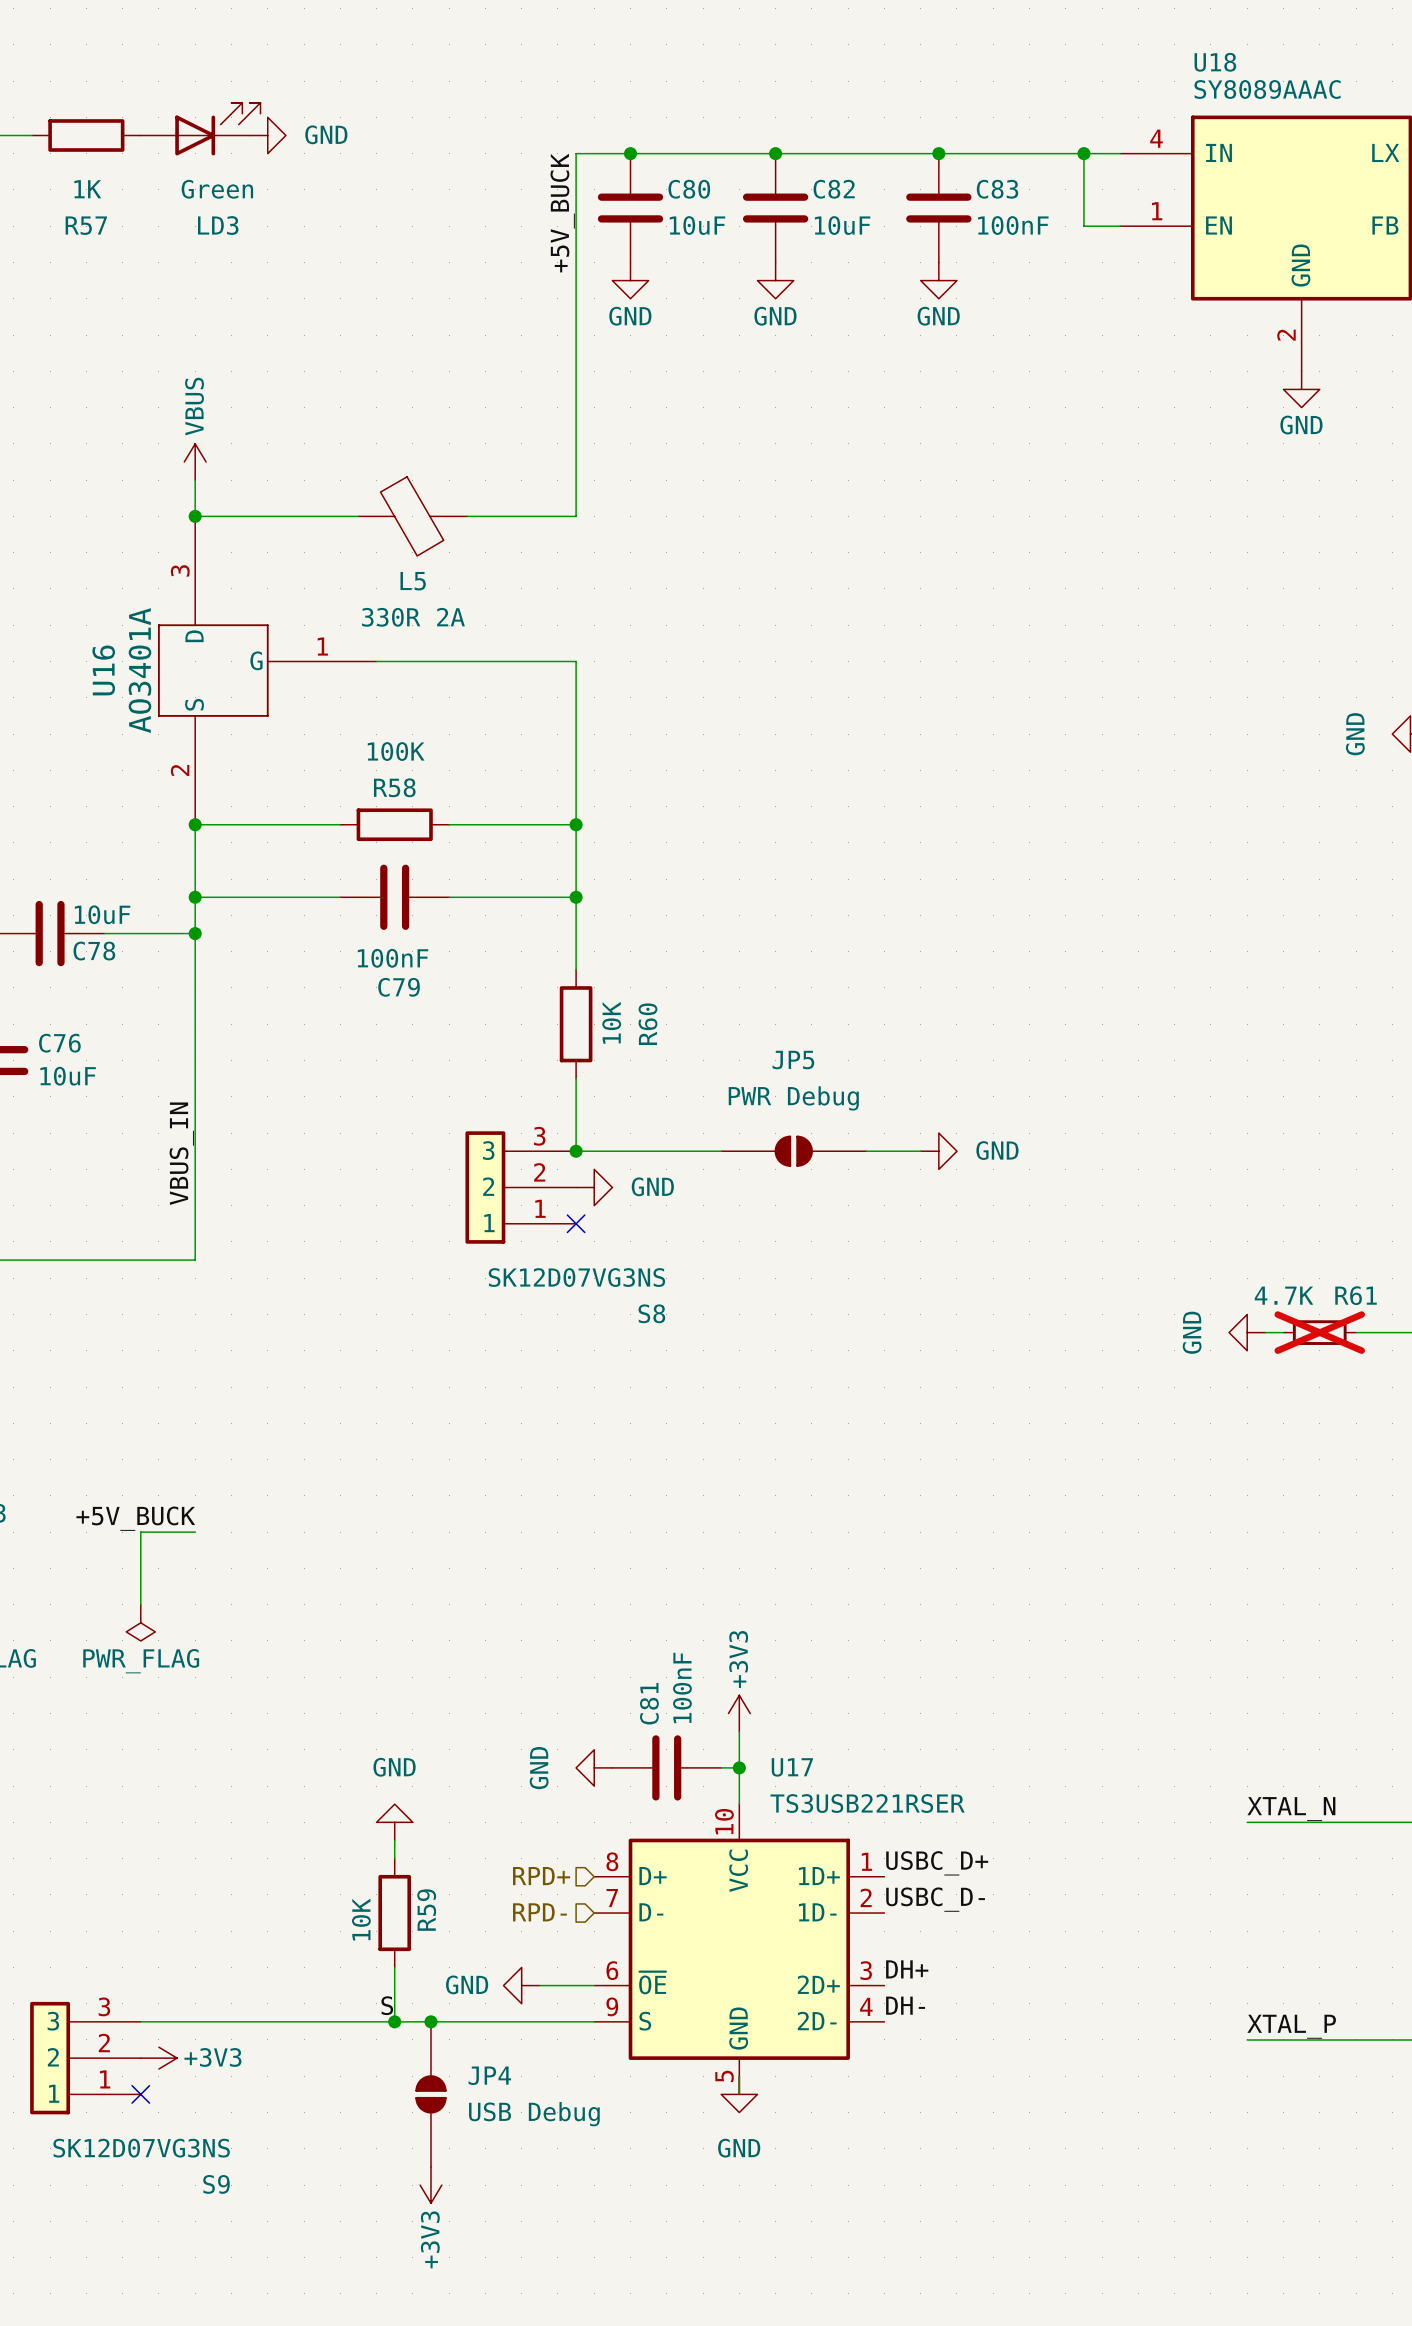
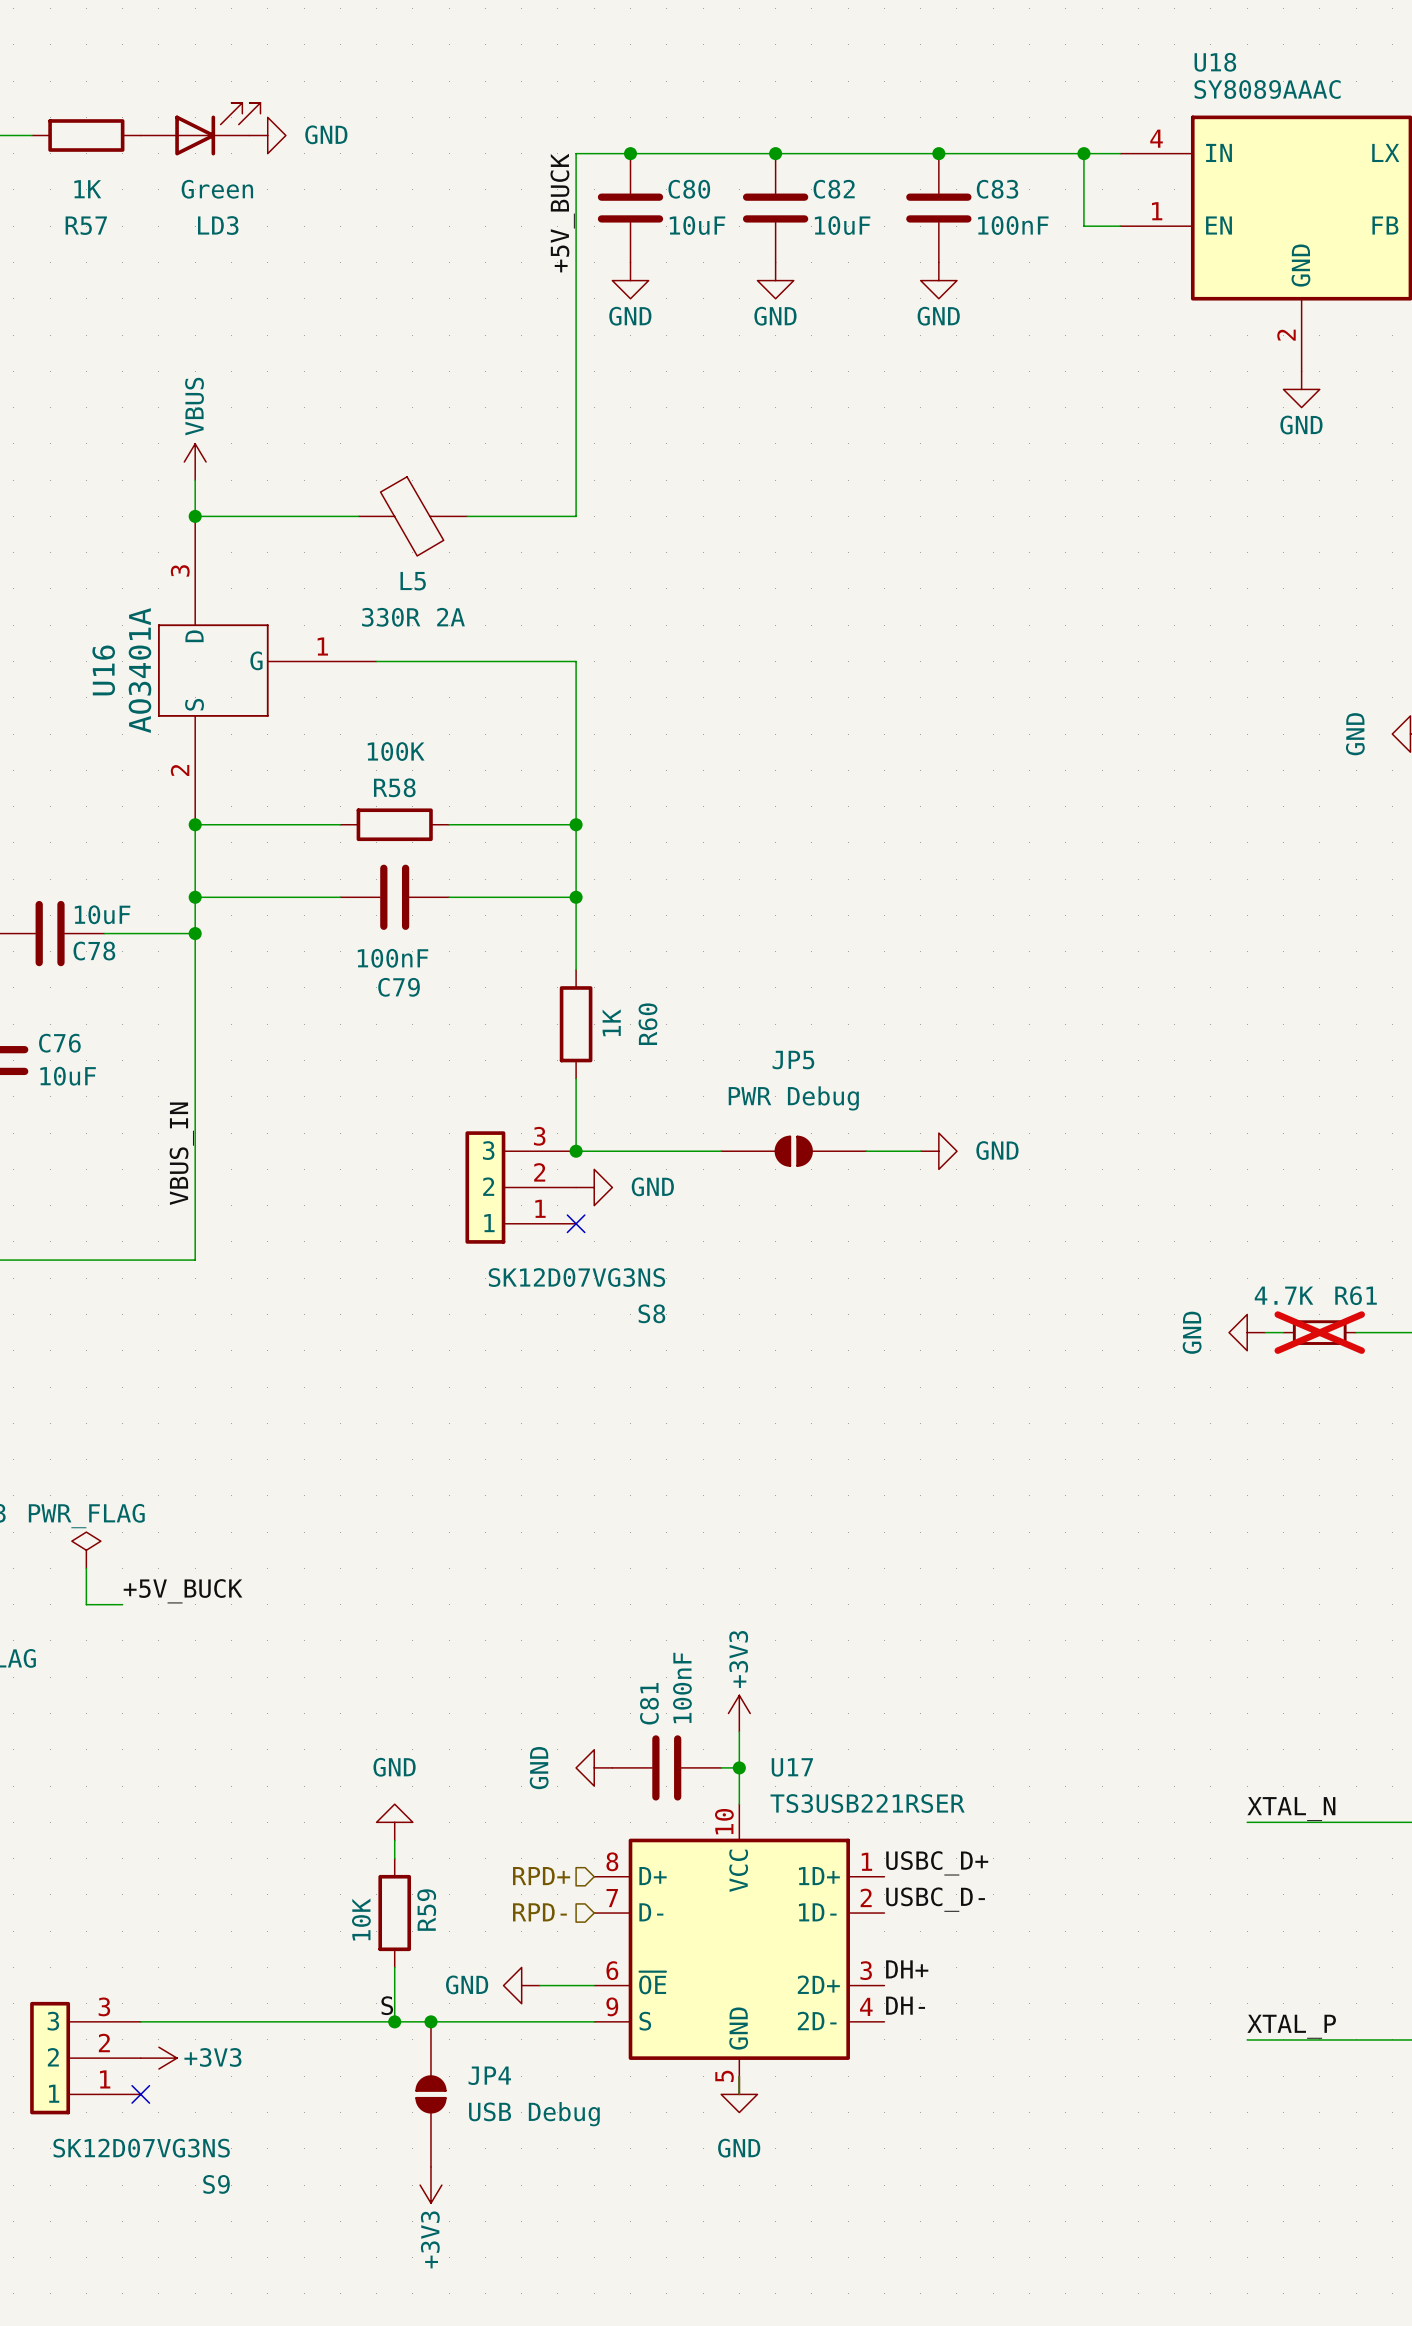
R60 value: 10K (611, 1022) -> 1K (611, 1022)
label position: +5V_BUCK (135, 1518) -> +5V_BUCK (183, 1591)
wire: (195, 1532) (140, 1532) (140, 1604) -> none
wire: none -> (86, 1568) (86, 1604) (122, 1604)
power symbol rotation: 0° (140, 1622) -> 180° (86, 1550)
power symbol position: PWR_FLAG (140, 1622) -> PWR_FLAG (86, 1550)

